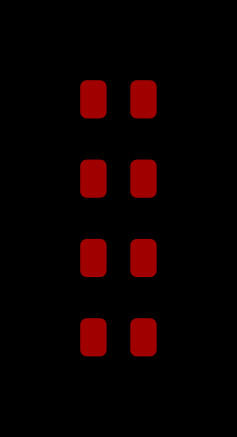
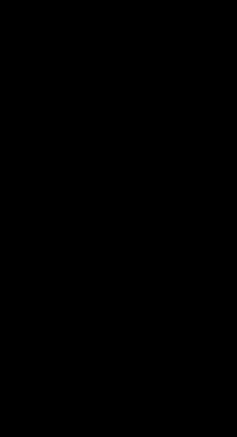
part: (118, 99) -> none
part: (118, 178) -> none
part: (118, 257) -> none
part: (118, 337) -> none

